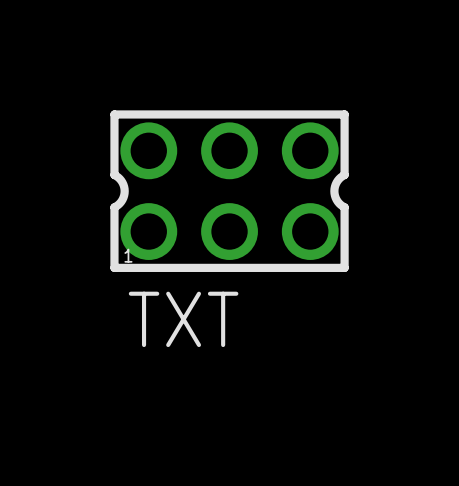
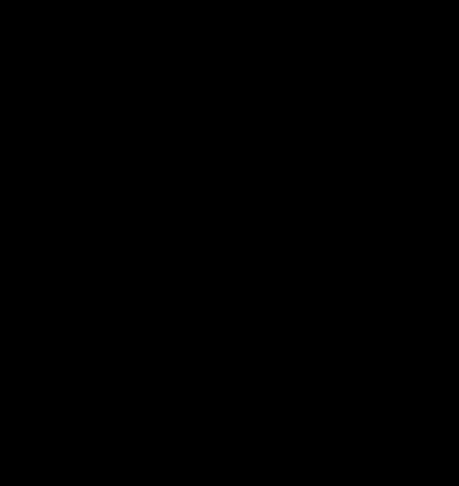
TXT: (229, 191) -> none

